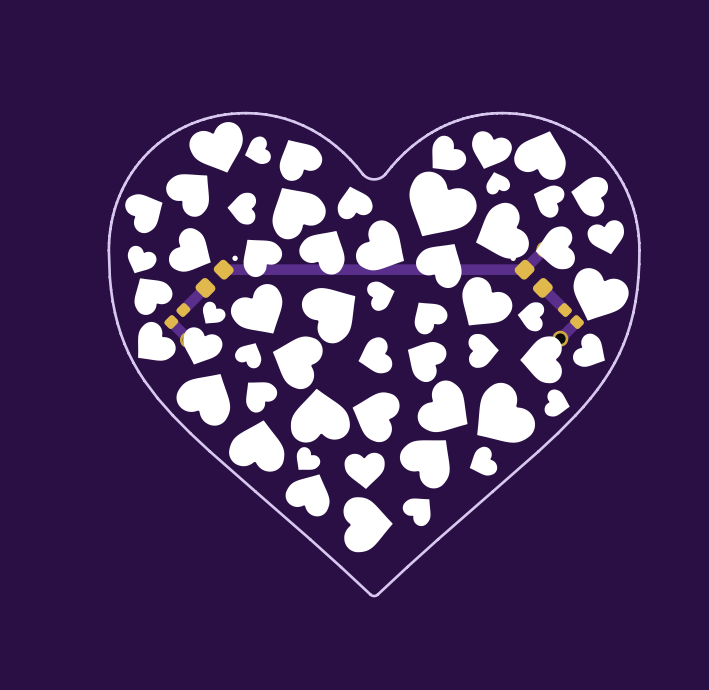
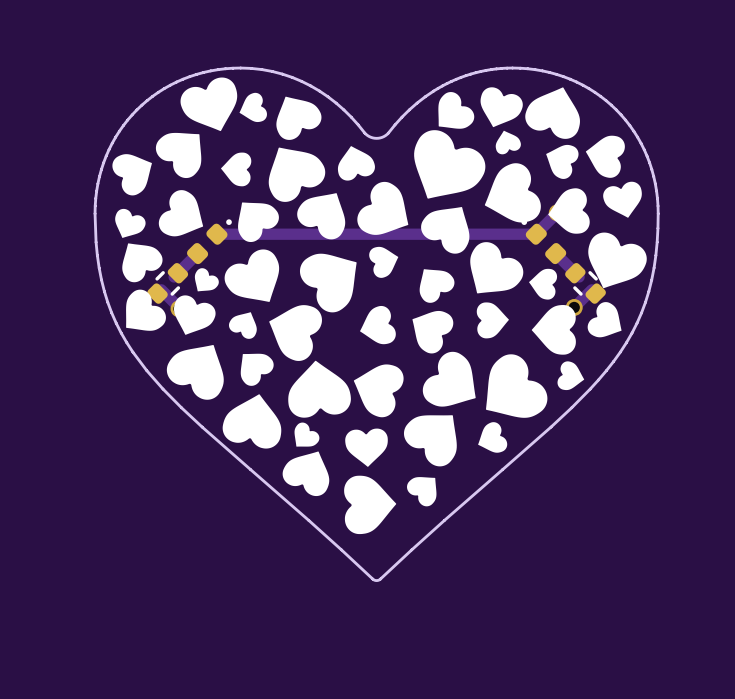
part footprint: [164, 303, 191, 330] -> [147, 263, 189, 304]
part footprint: [557, 303, 584, 330] -> [565, 263, 606, 304]

